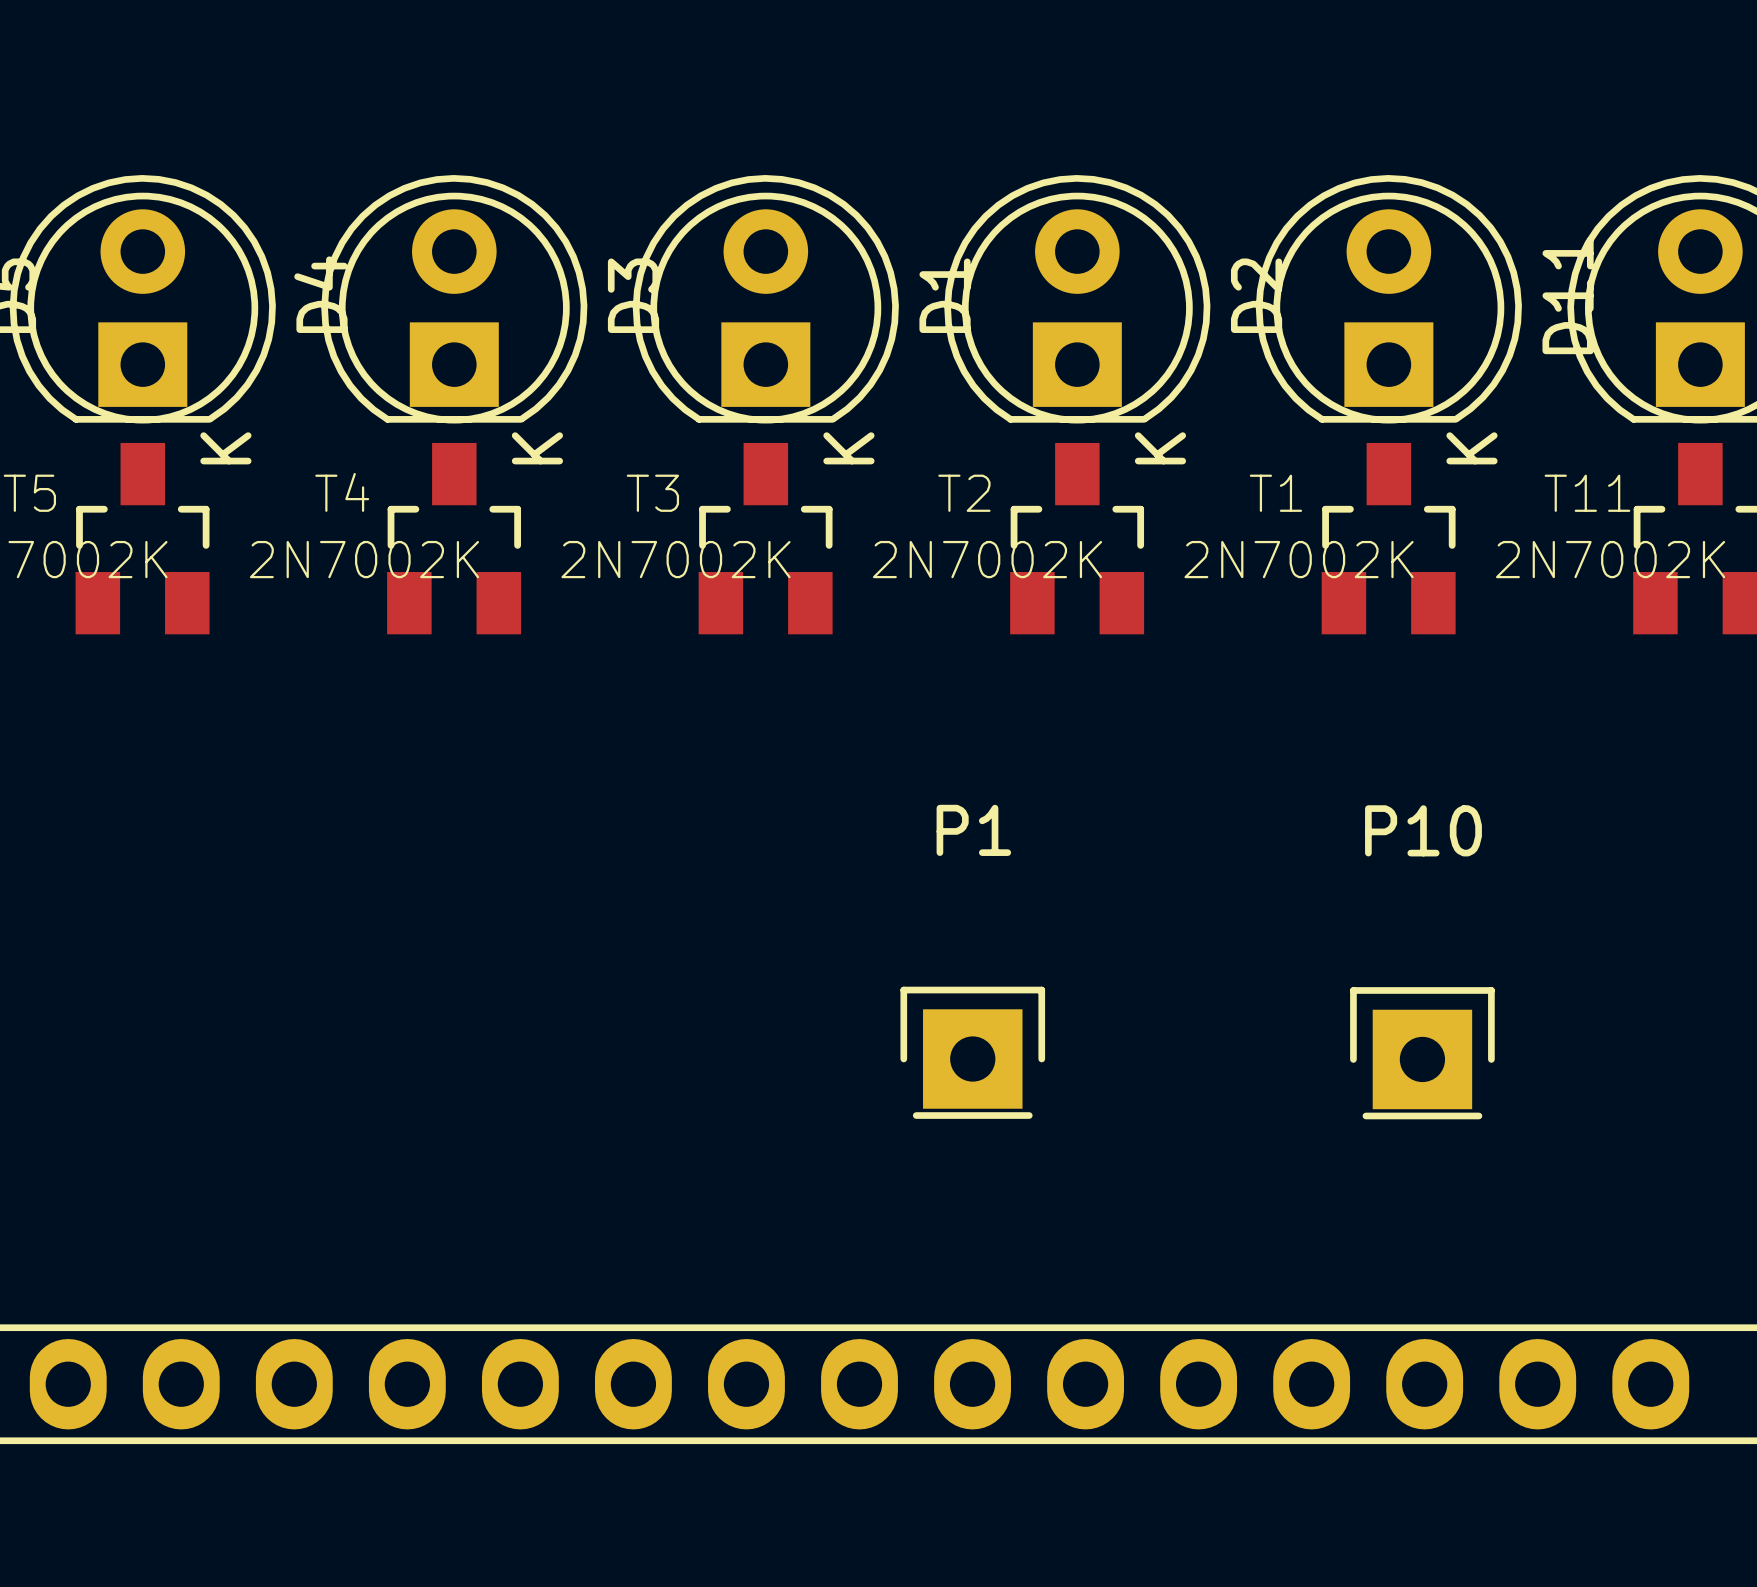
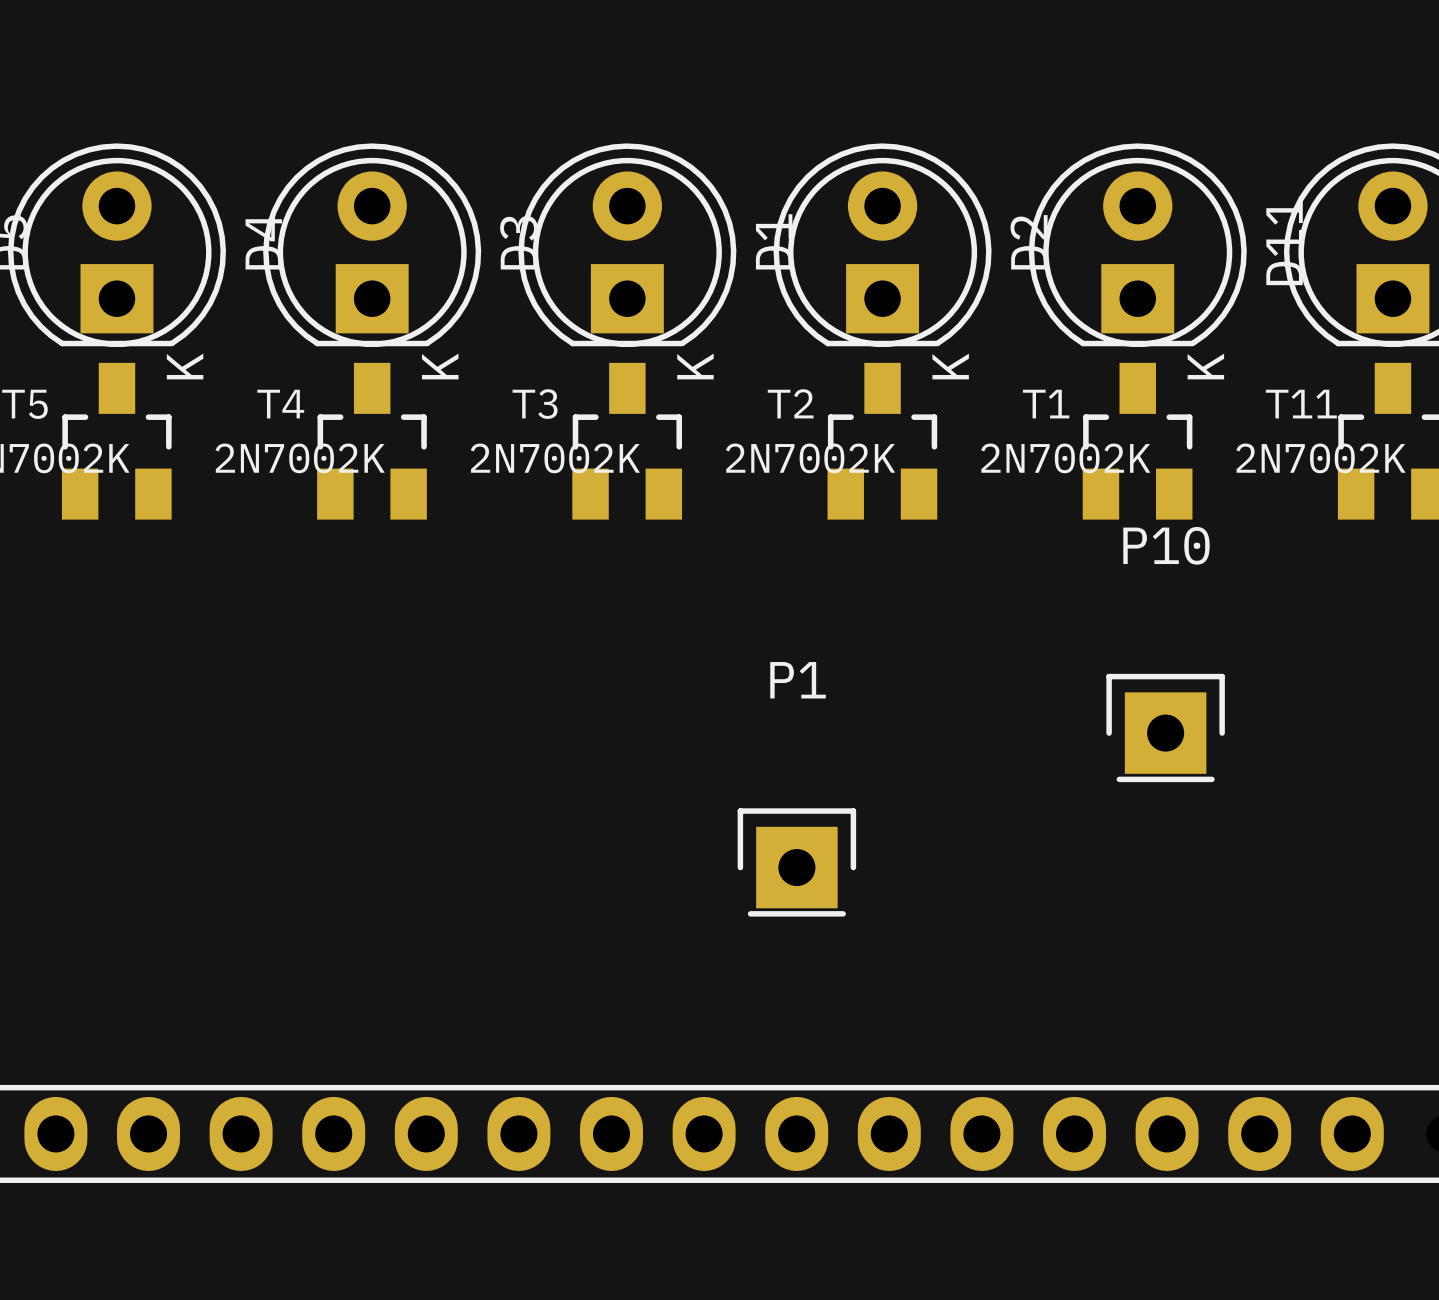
P10 position: (1422, 1053) -> (1165, 727)

